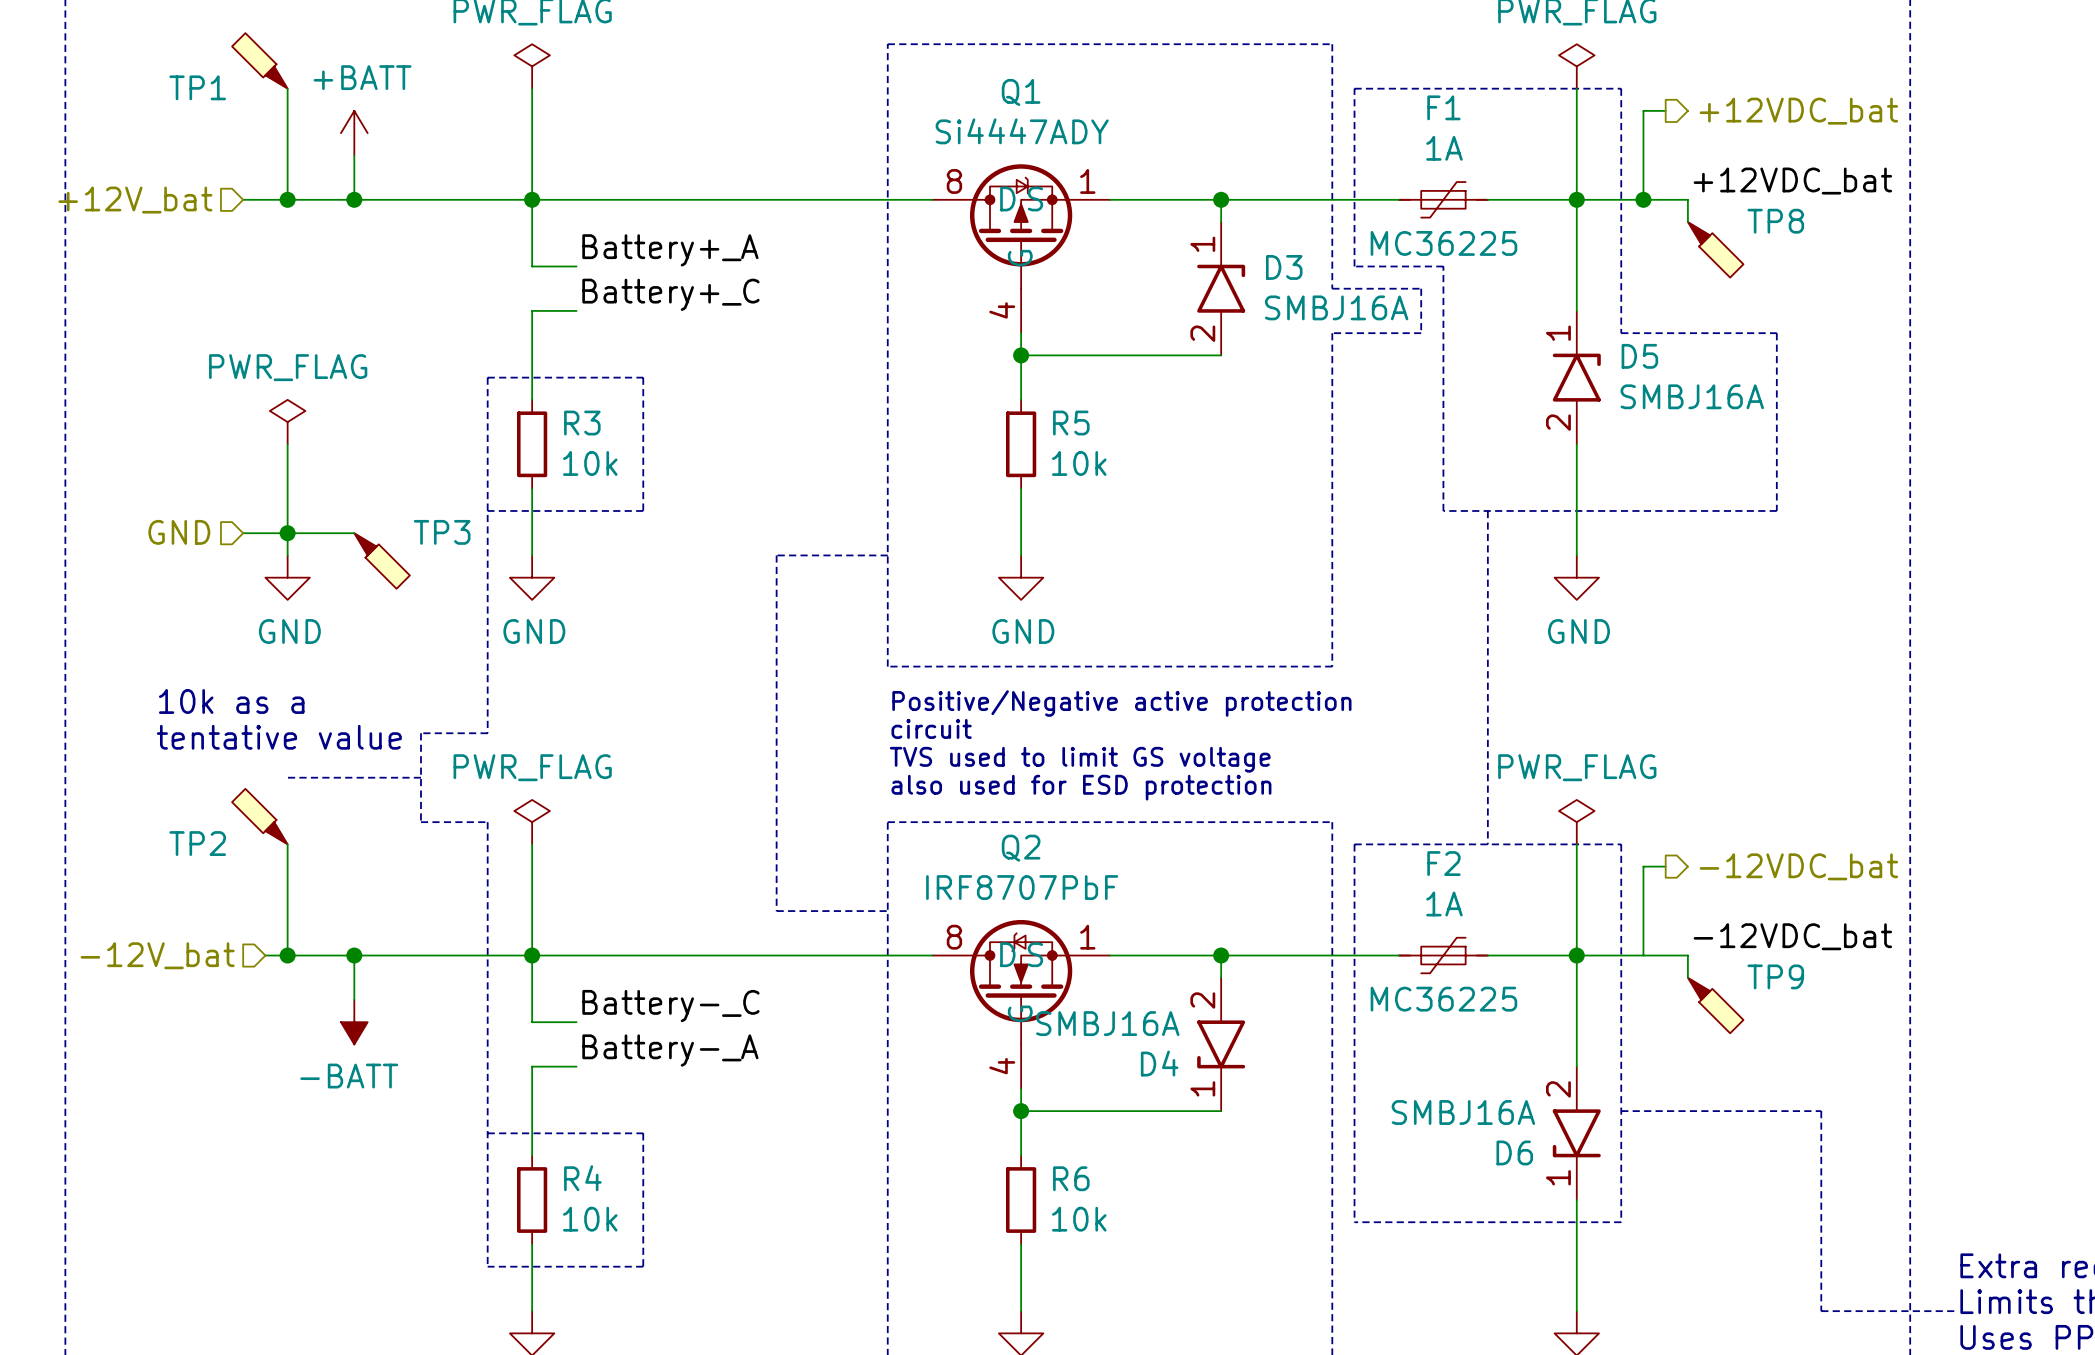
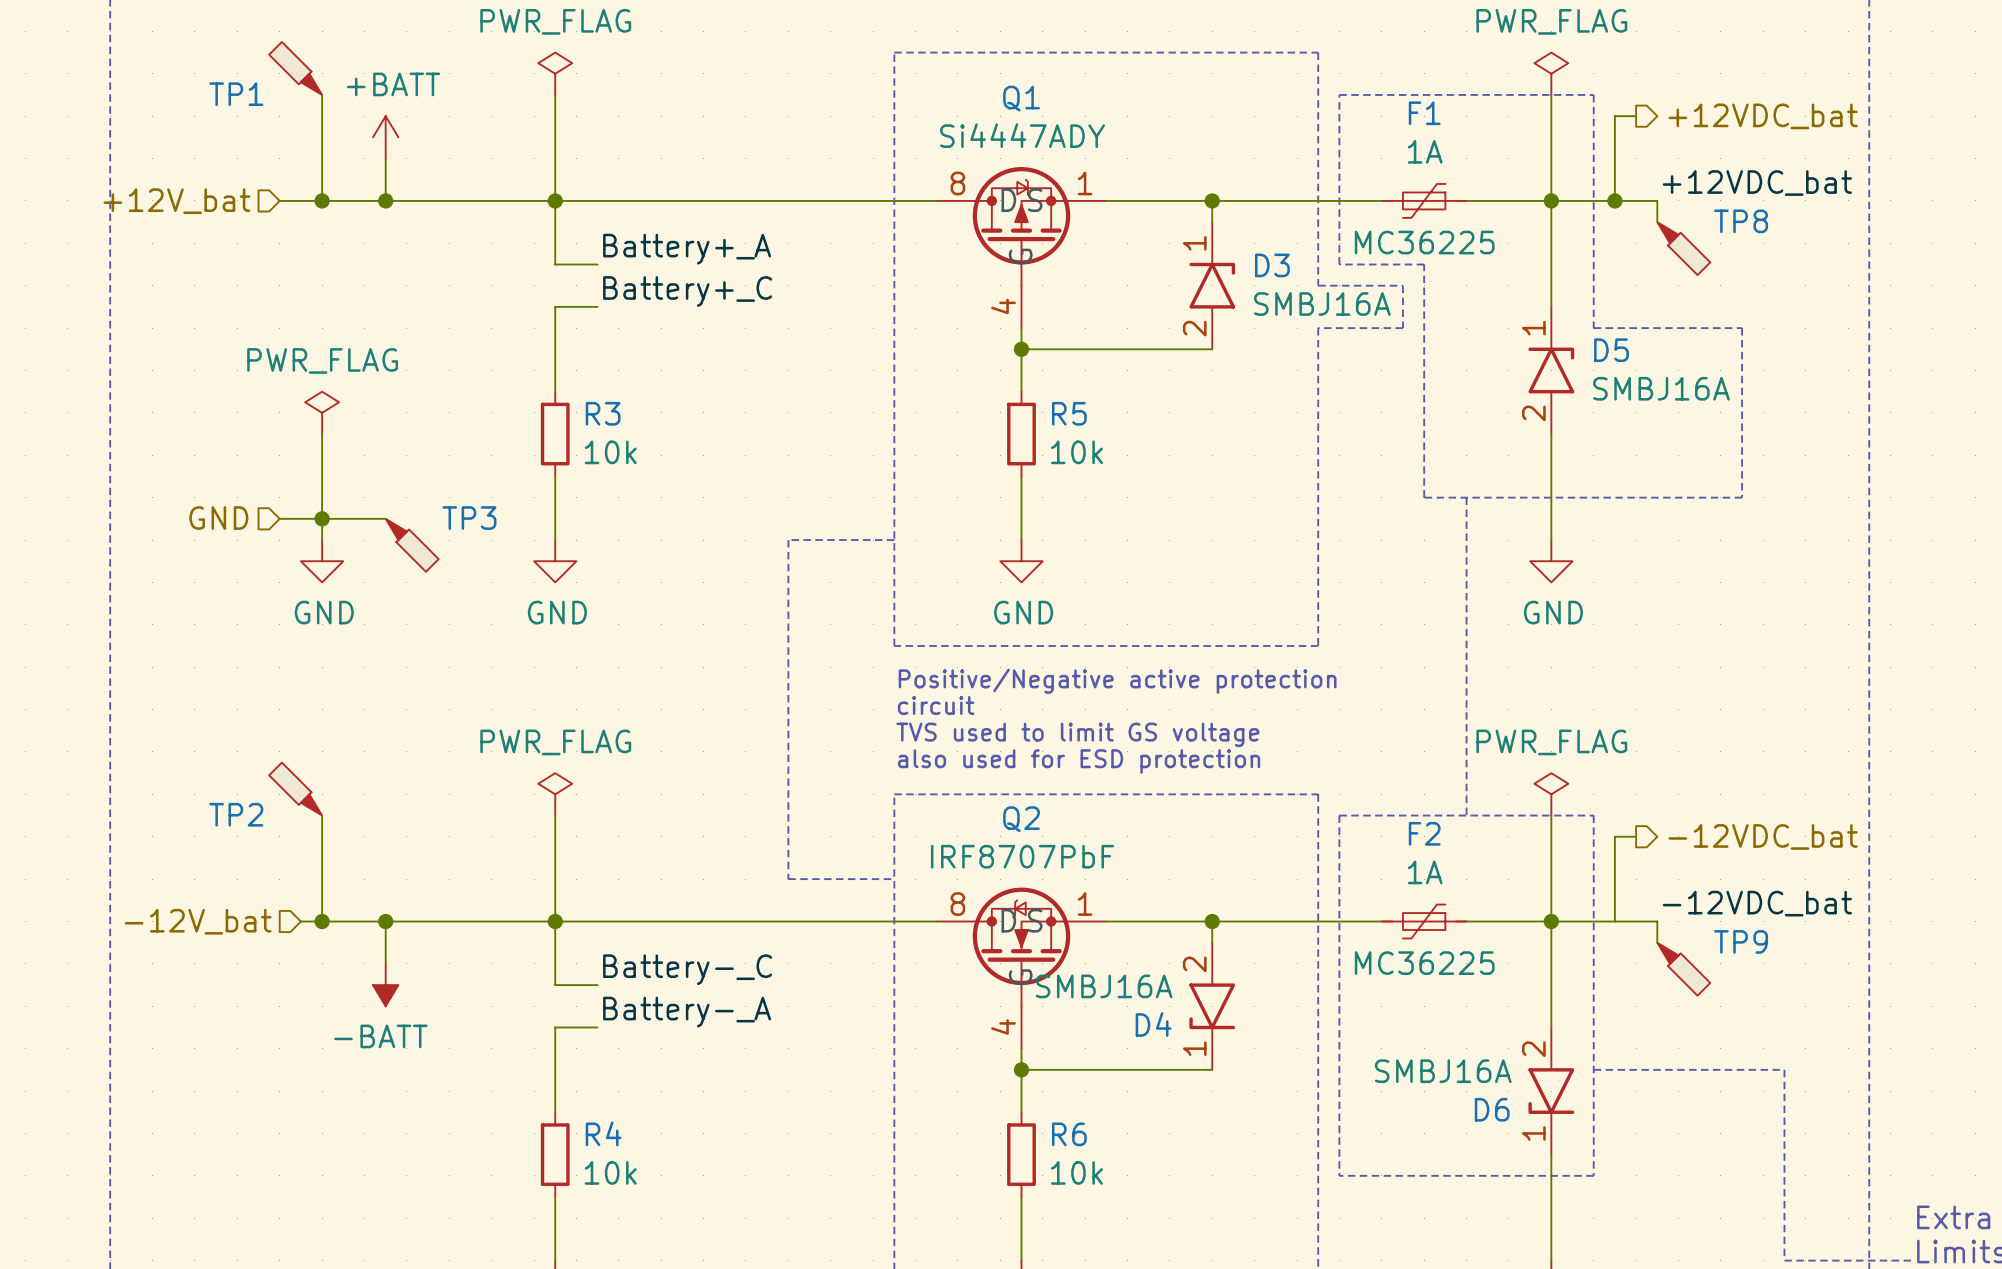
line: (487, 510) (643, 510) (643, 377) (487, 377) (487, 733) (420, 733) (420, 822) (487, 822) (487, 1266) (643, 1266) (643, 1133) (487, 1133) -> none
text: 10k as a (231, 701) -> none
text: tentative value (279, 737) -> none
line: (287, 777) (420, 777) -> none

